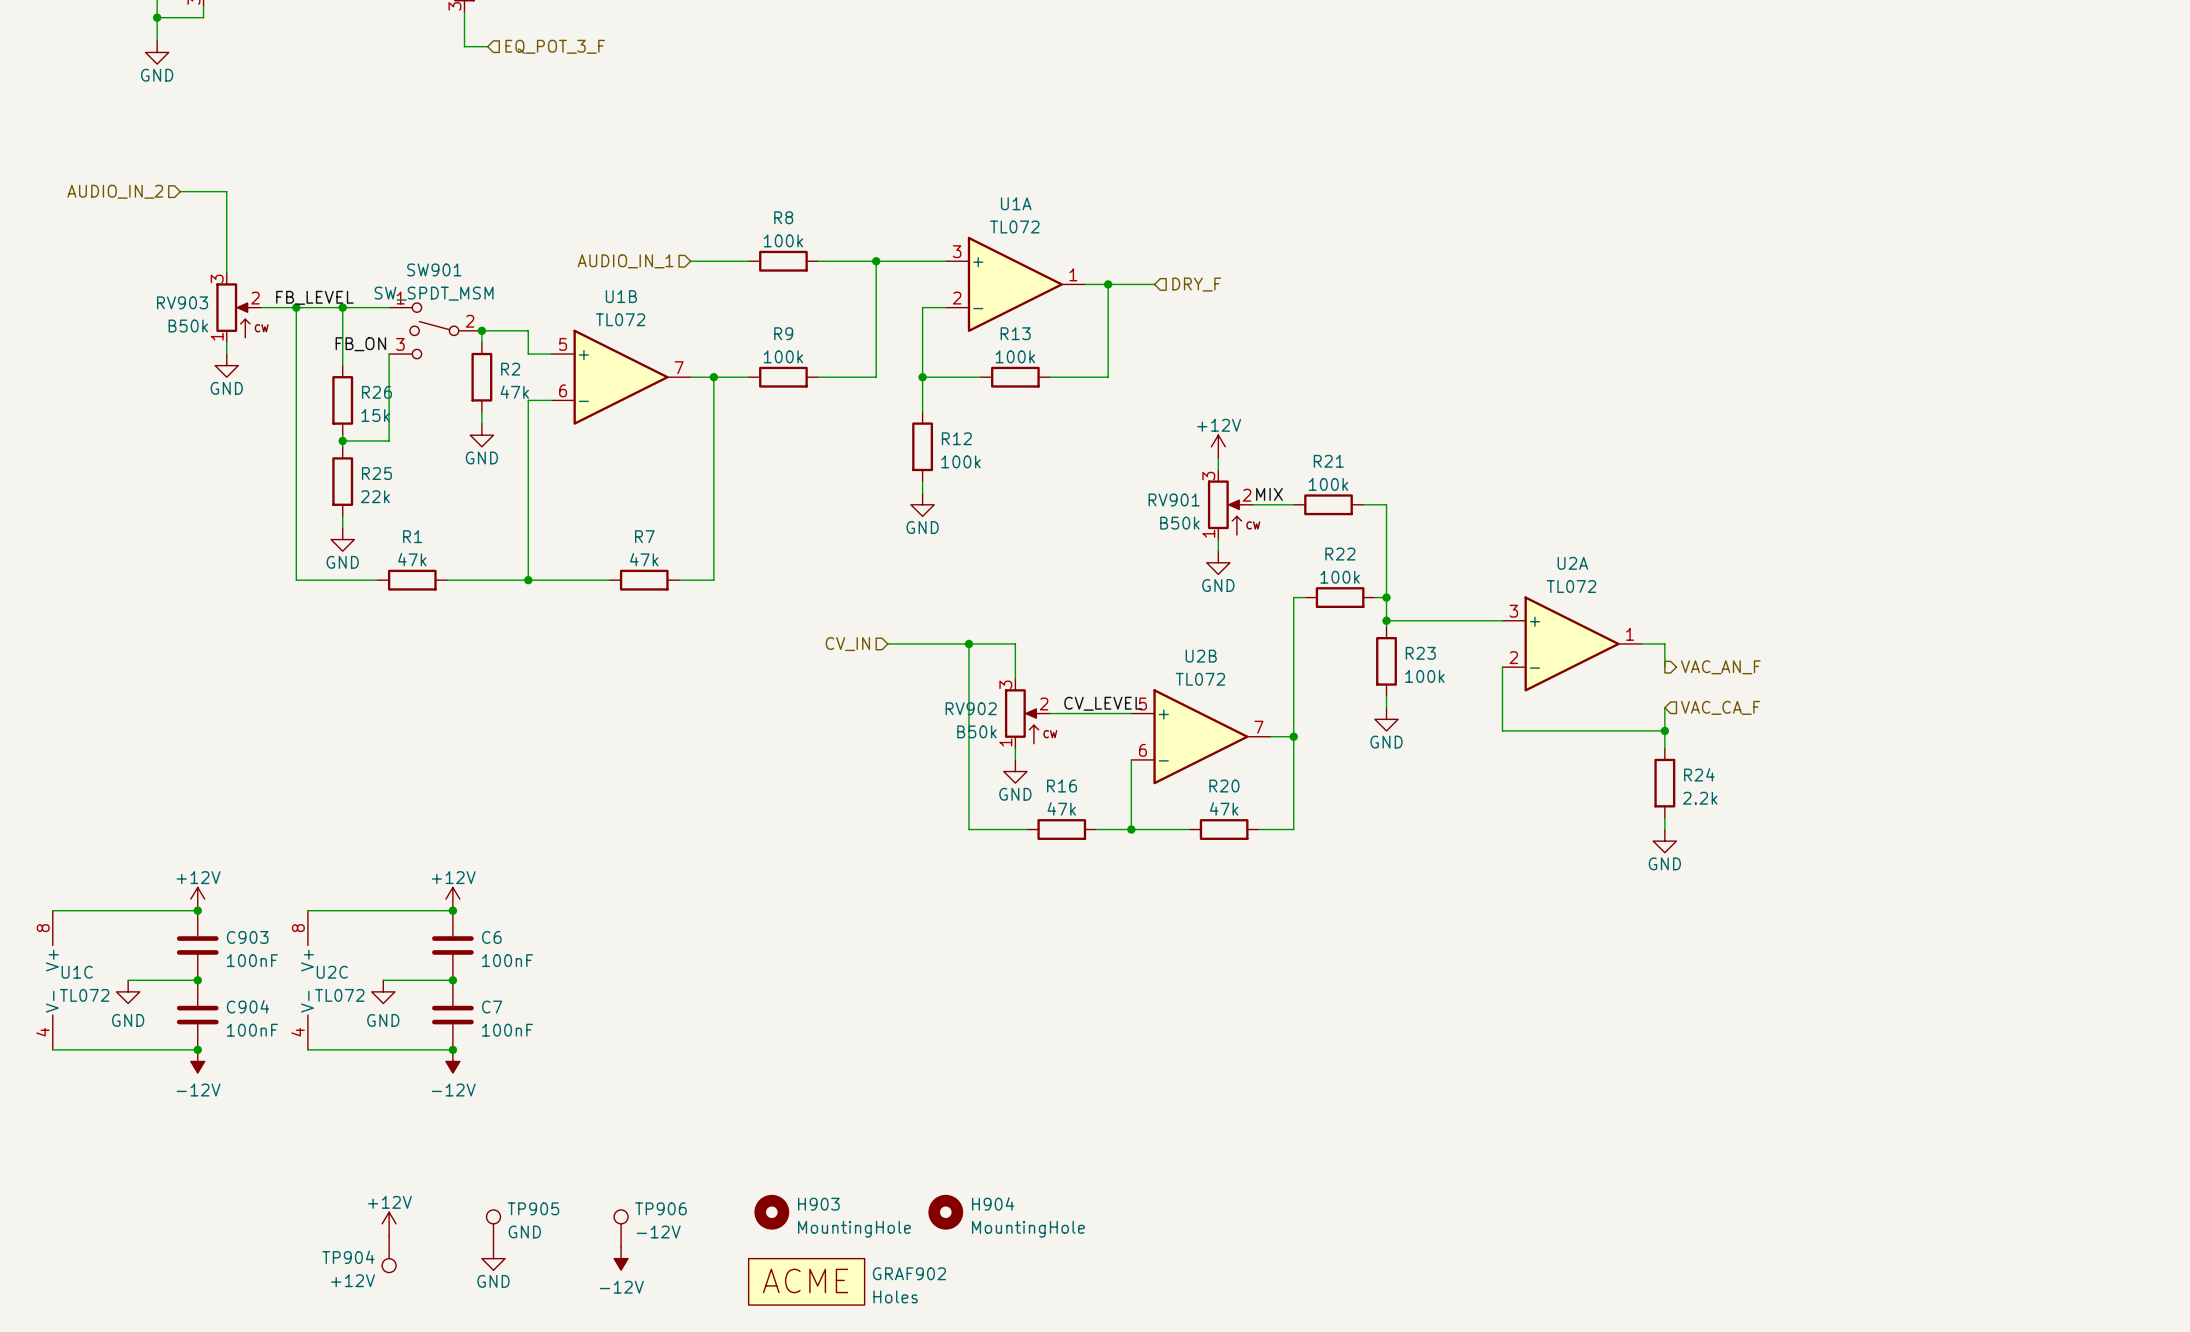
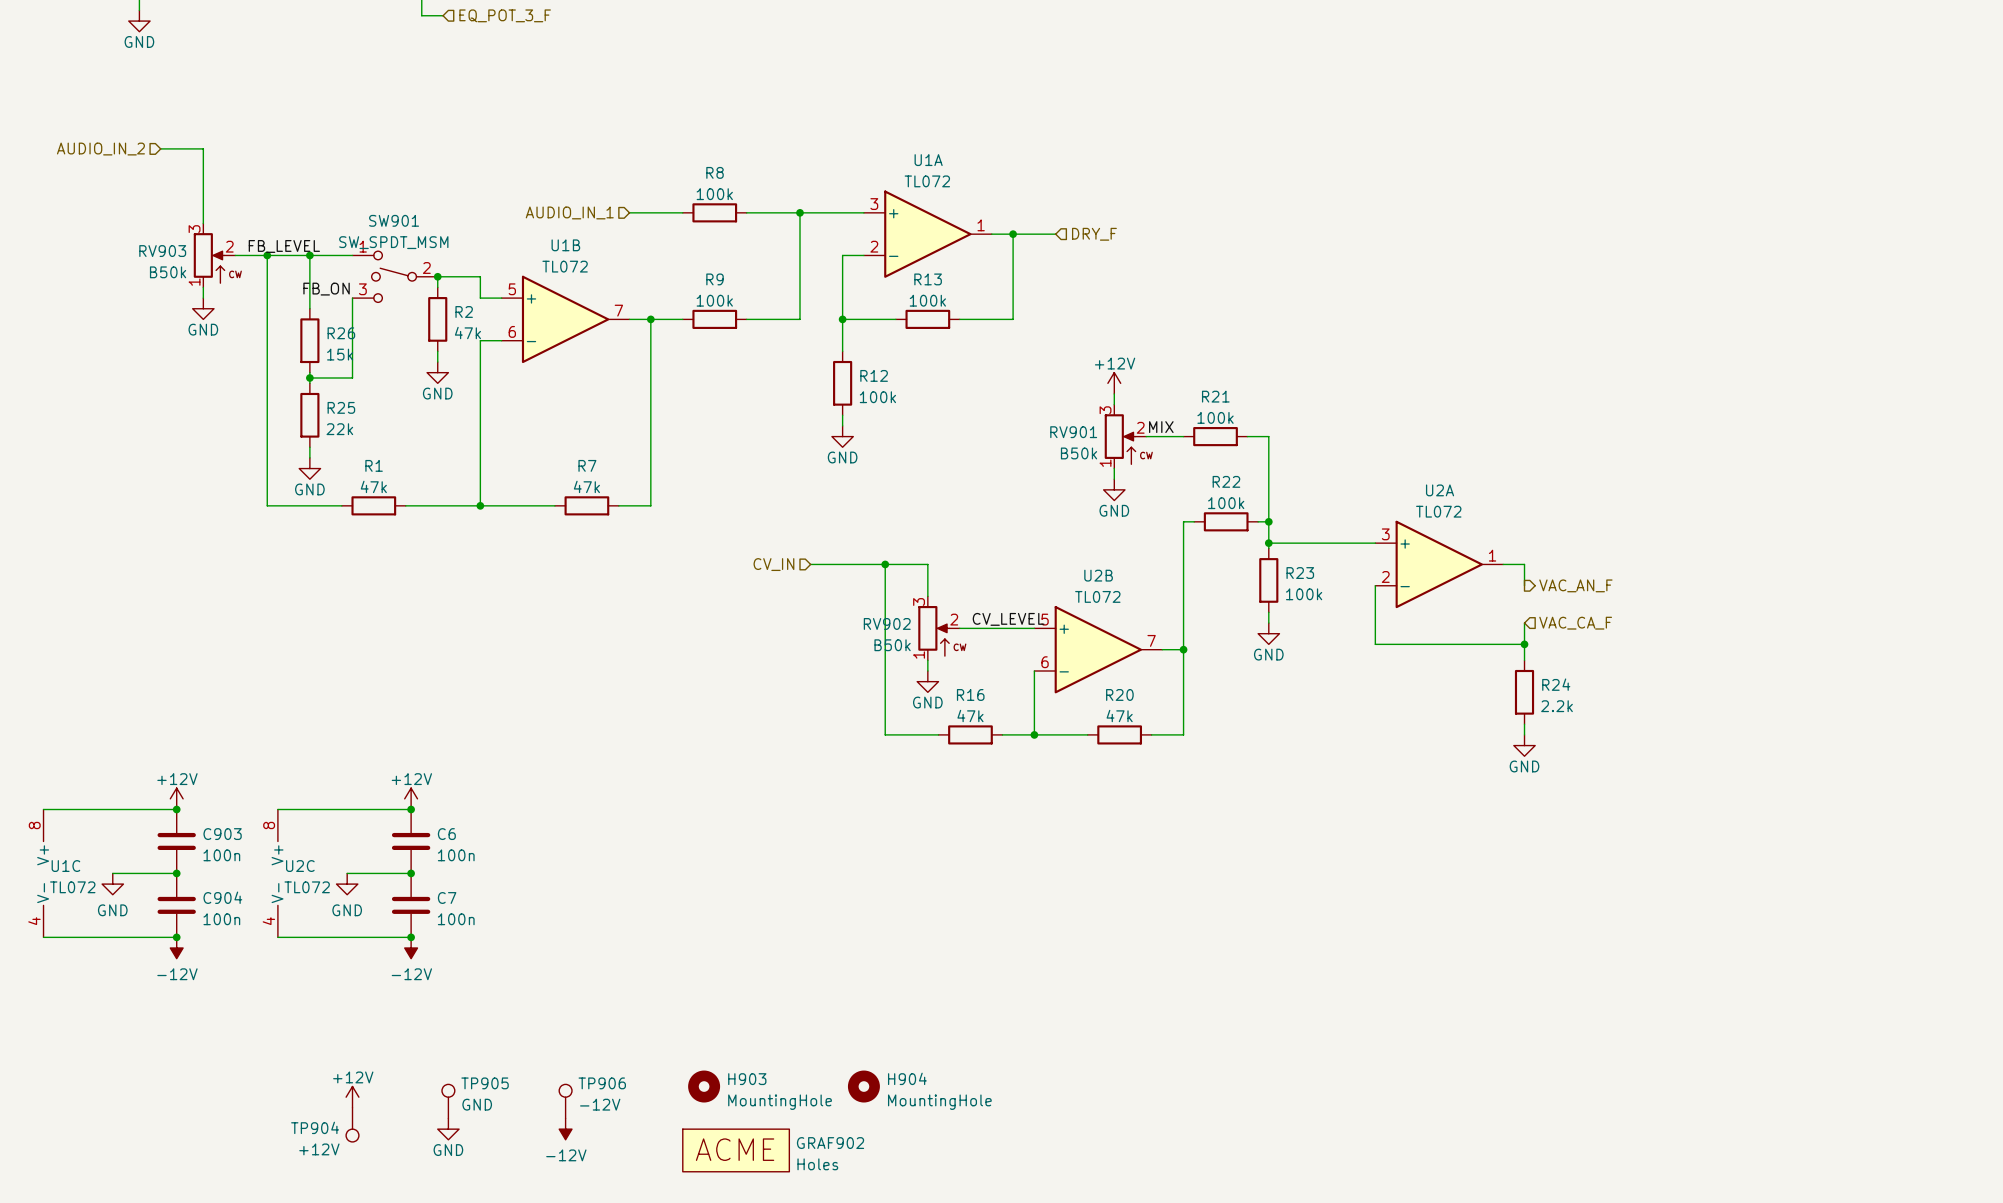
C903 value: 100nF (252, 960) -> 100n (221, 855)
C6 value: 100nF (507, 960) -> 100n (456, 855)
C904 value: 100nF (252, 1030) -> 100n (221, 919)
C7 value: 100nF (507, 1030) -> 100n (456, 919)

